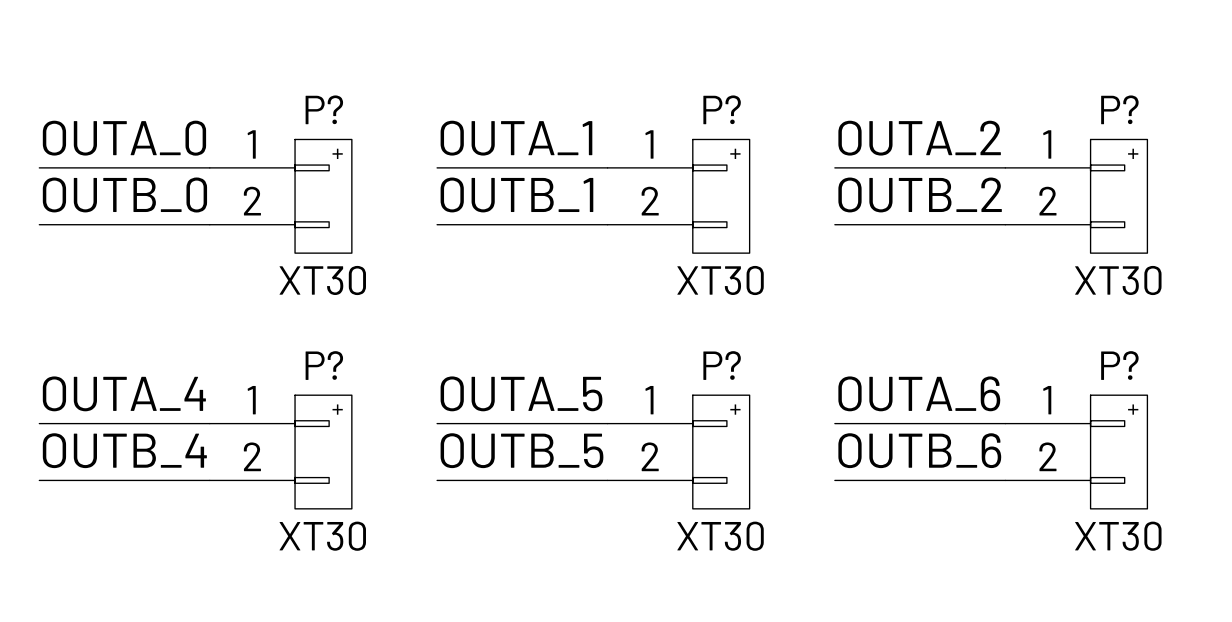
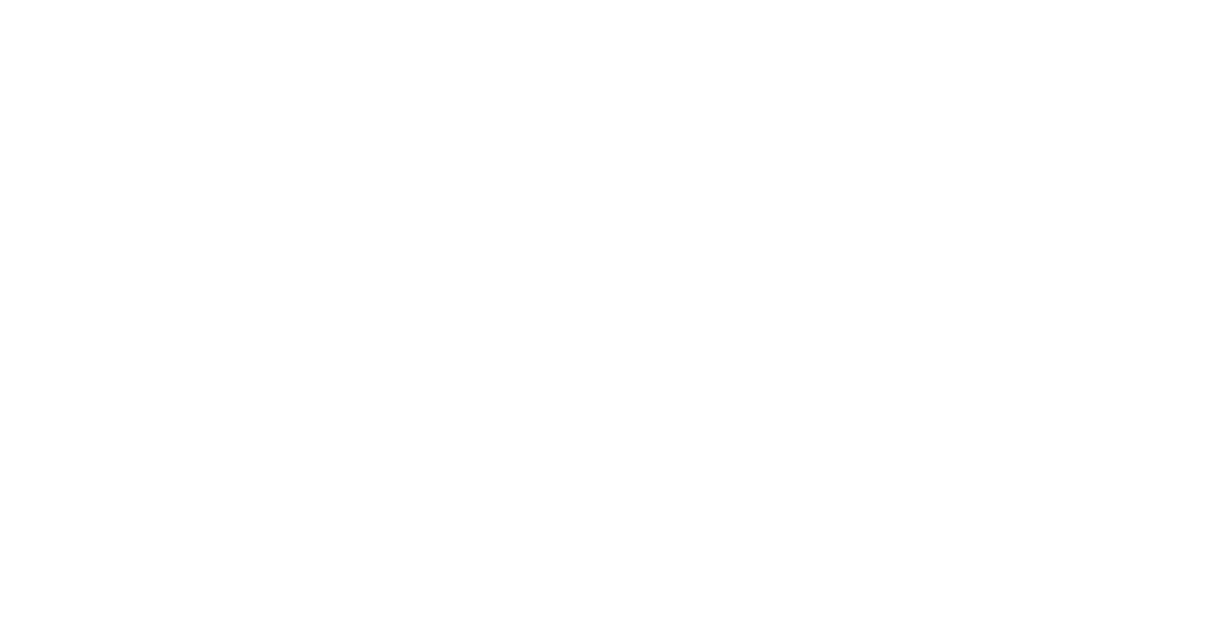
label: OUTA_0 (124, 138) -> none
label: OUTA_1 (516, 138) -> none
label: OUTA_2 (919, 138) -> none
wire: (39, 167) (209, 167) -> none
wire: (437, 167) (607, 167) -> none
wire: (834, 167) (1005, 167) -> none
label: OUTB_0 (124, 194) -> none
label: OUTB_1 (516, 194) -> none
label: OUTB_2 (920, 194) -> none
P?: XT30 (280, 196) -> none
P?: XT30 (678, 196) -> none
P?: XT30 (1076, 196) -> none
wire: (39, 224) (209, 224) -> none
wire: (437, 224) (607, 224) -> none
wire: (834, 224) (1005, 224) -> none
label: OUTA_4 (124, 393) -> none
label: OUTA_5 (521, 393) -> none
label: OUTA_6 (919, 393) -> none
wire: (39, 423) (209, 423) -> none
wire: (437, 423) (607, 423) -> none
wire: (834, 423) (1005, 423) -> none
label: OUTB_4 (124, 450) -> none
label: OUTB_5 (521, 450) -> none
label: OUTB_6 (919, 450) -> none
P?: XT30 (280, 452) -> none
P?: XT30 (678, 452) -> none
P?: XT30 (1076, 452) -> none
wire: (39, 480) (209, 480) -> none
wire: (437, 480) (607, 480) -> none
wire: (834, 480) (1005, 480) -> none

